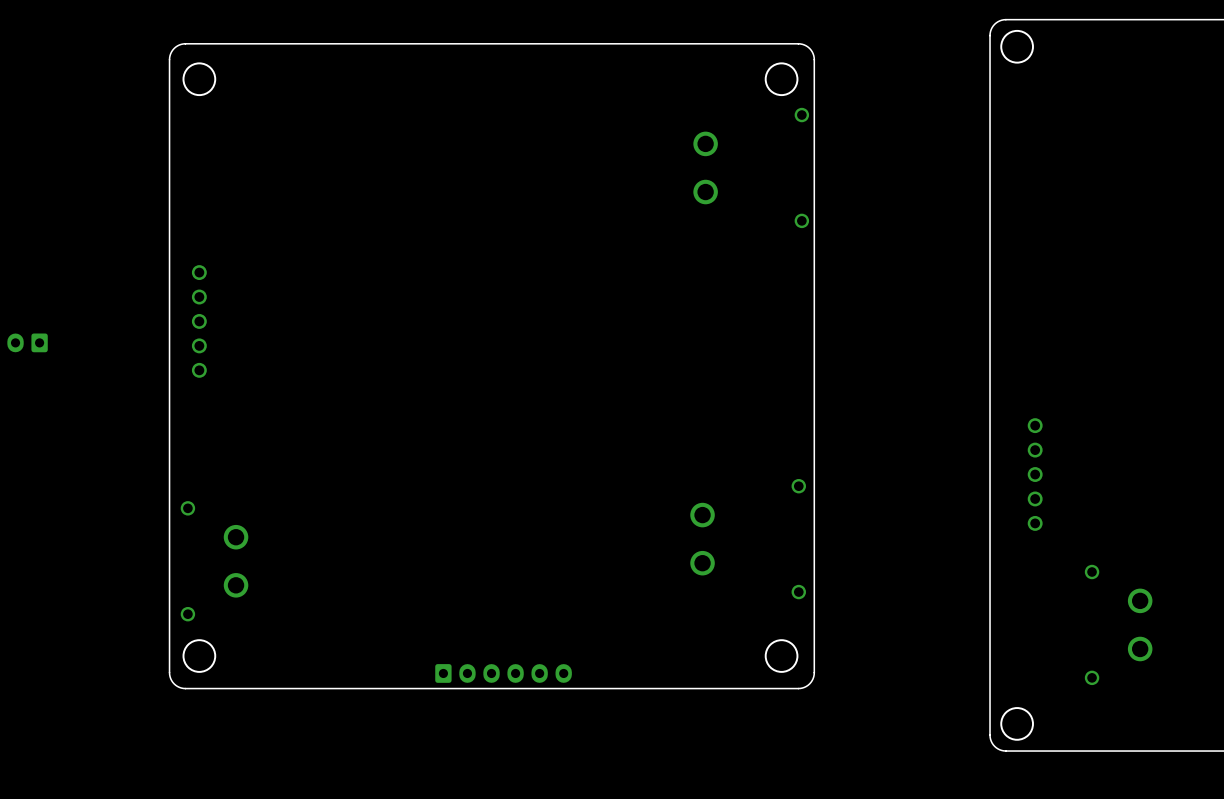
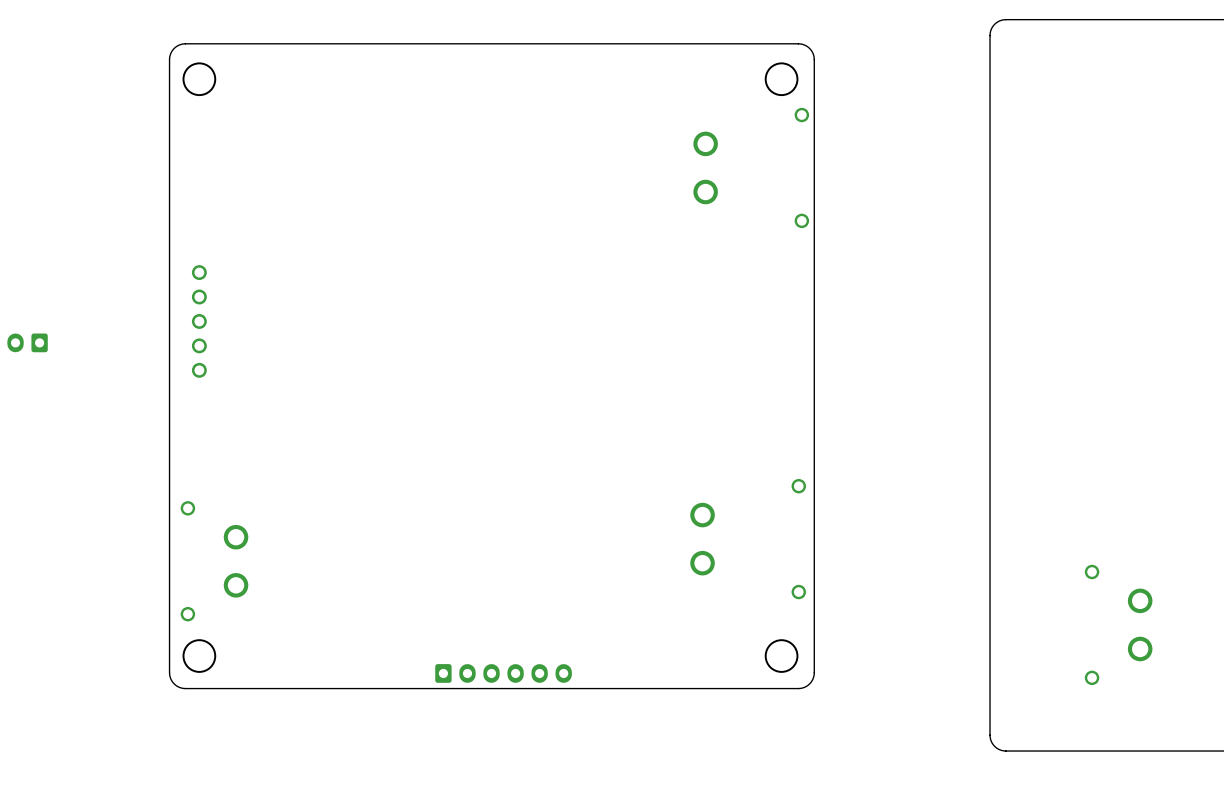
round board edge: [1000, 29, 1034, 64] -> none
part: (1035, 474) -> none
round board edge: [1000, 707, 1034, 741] -> none

